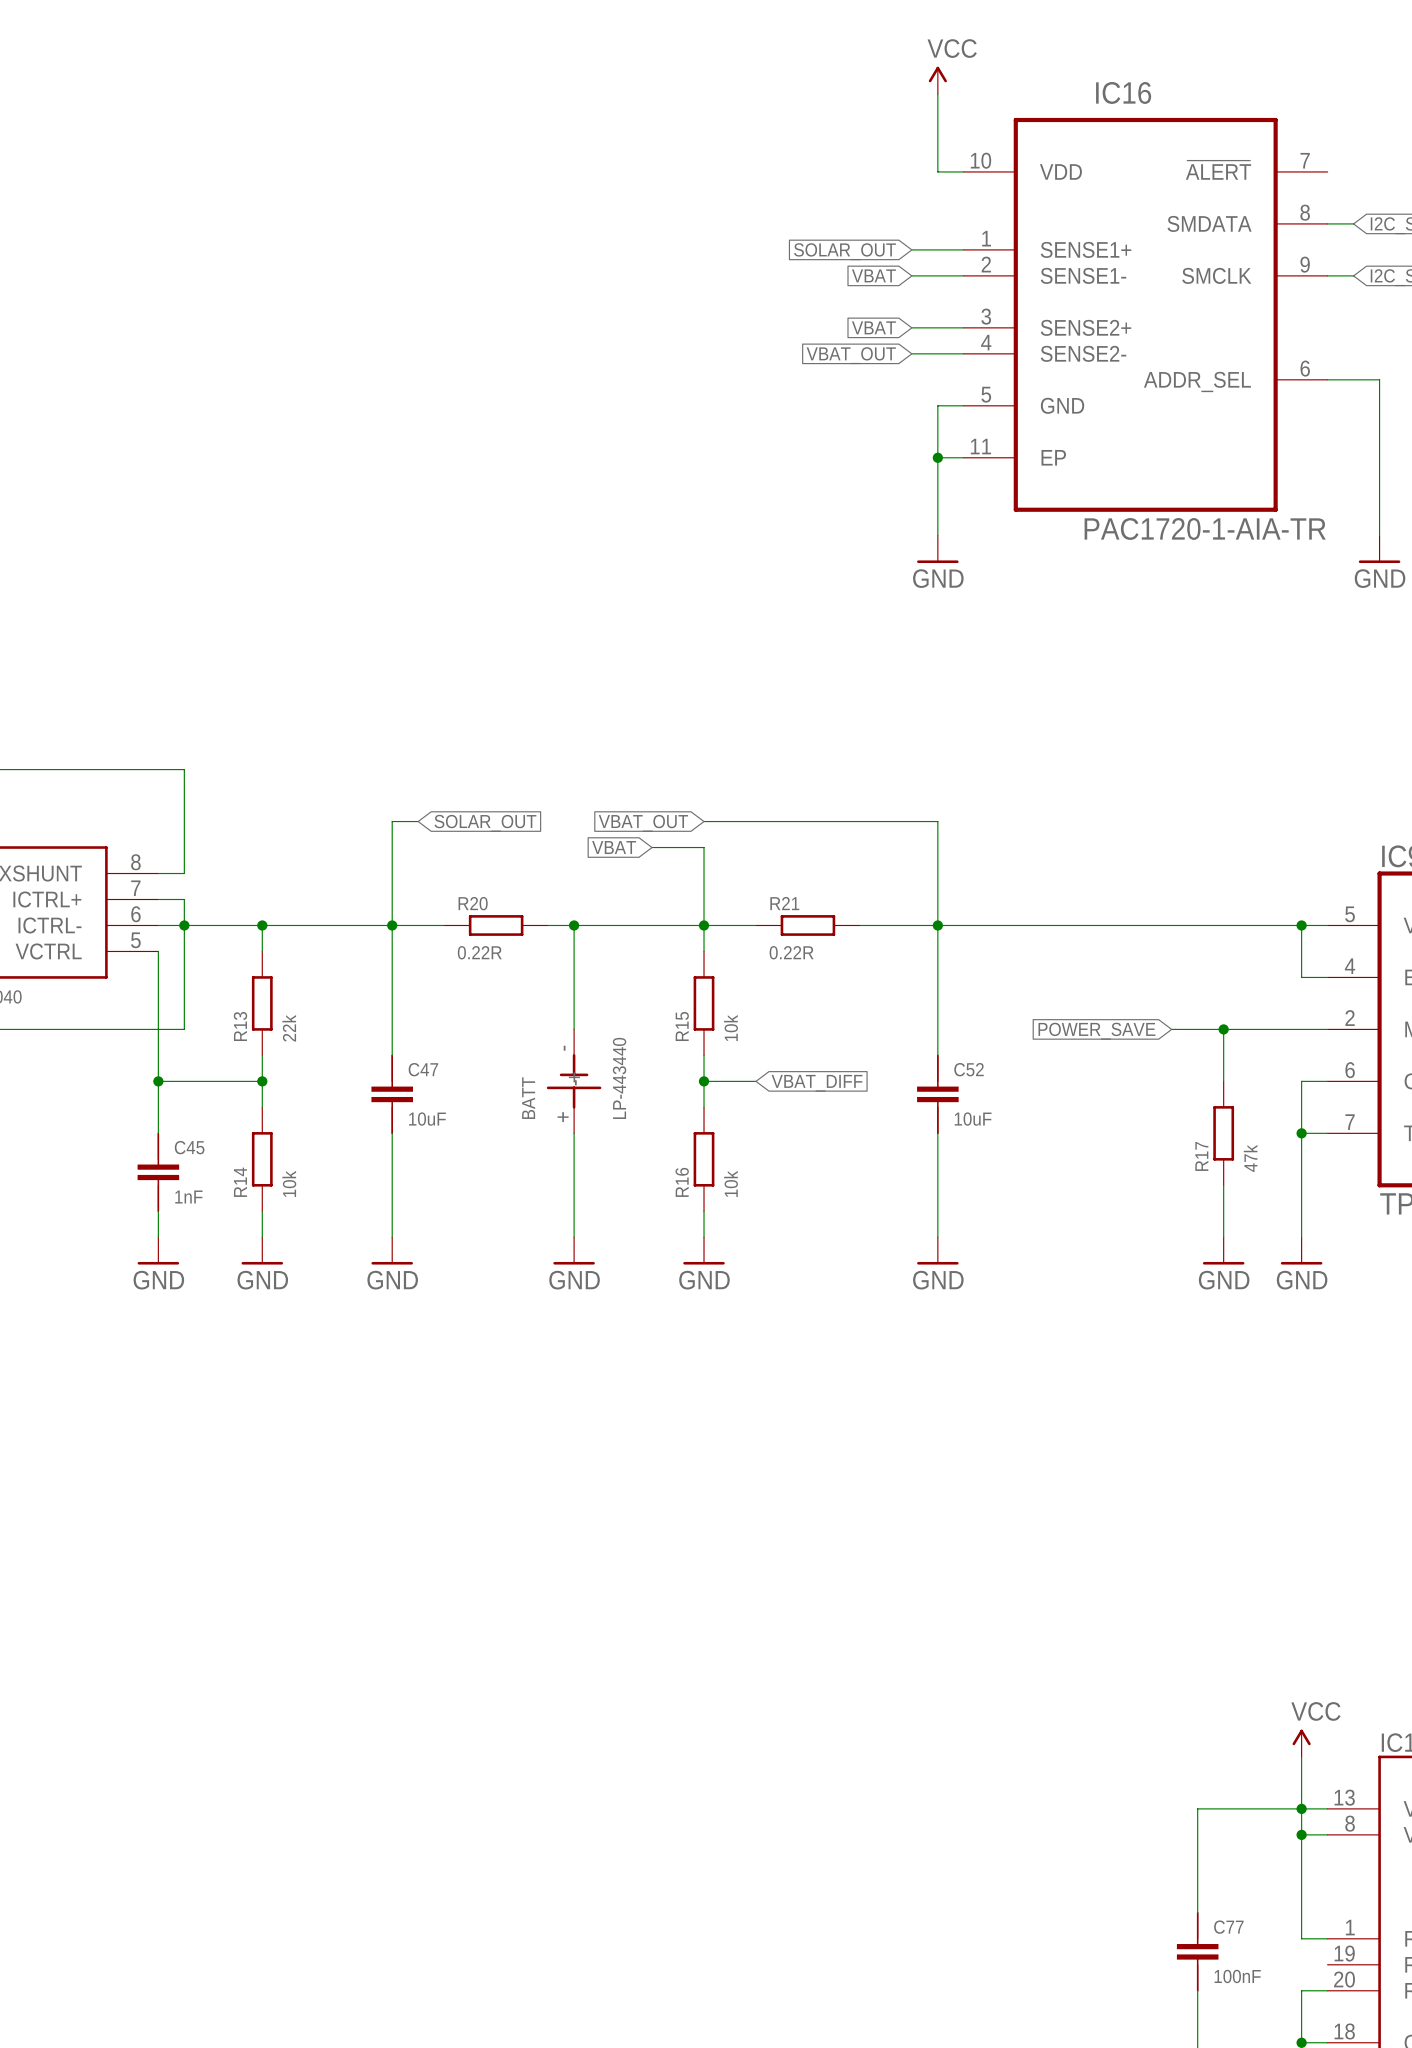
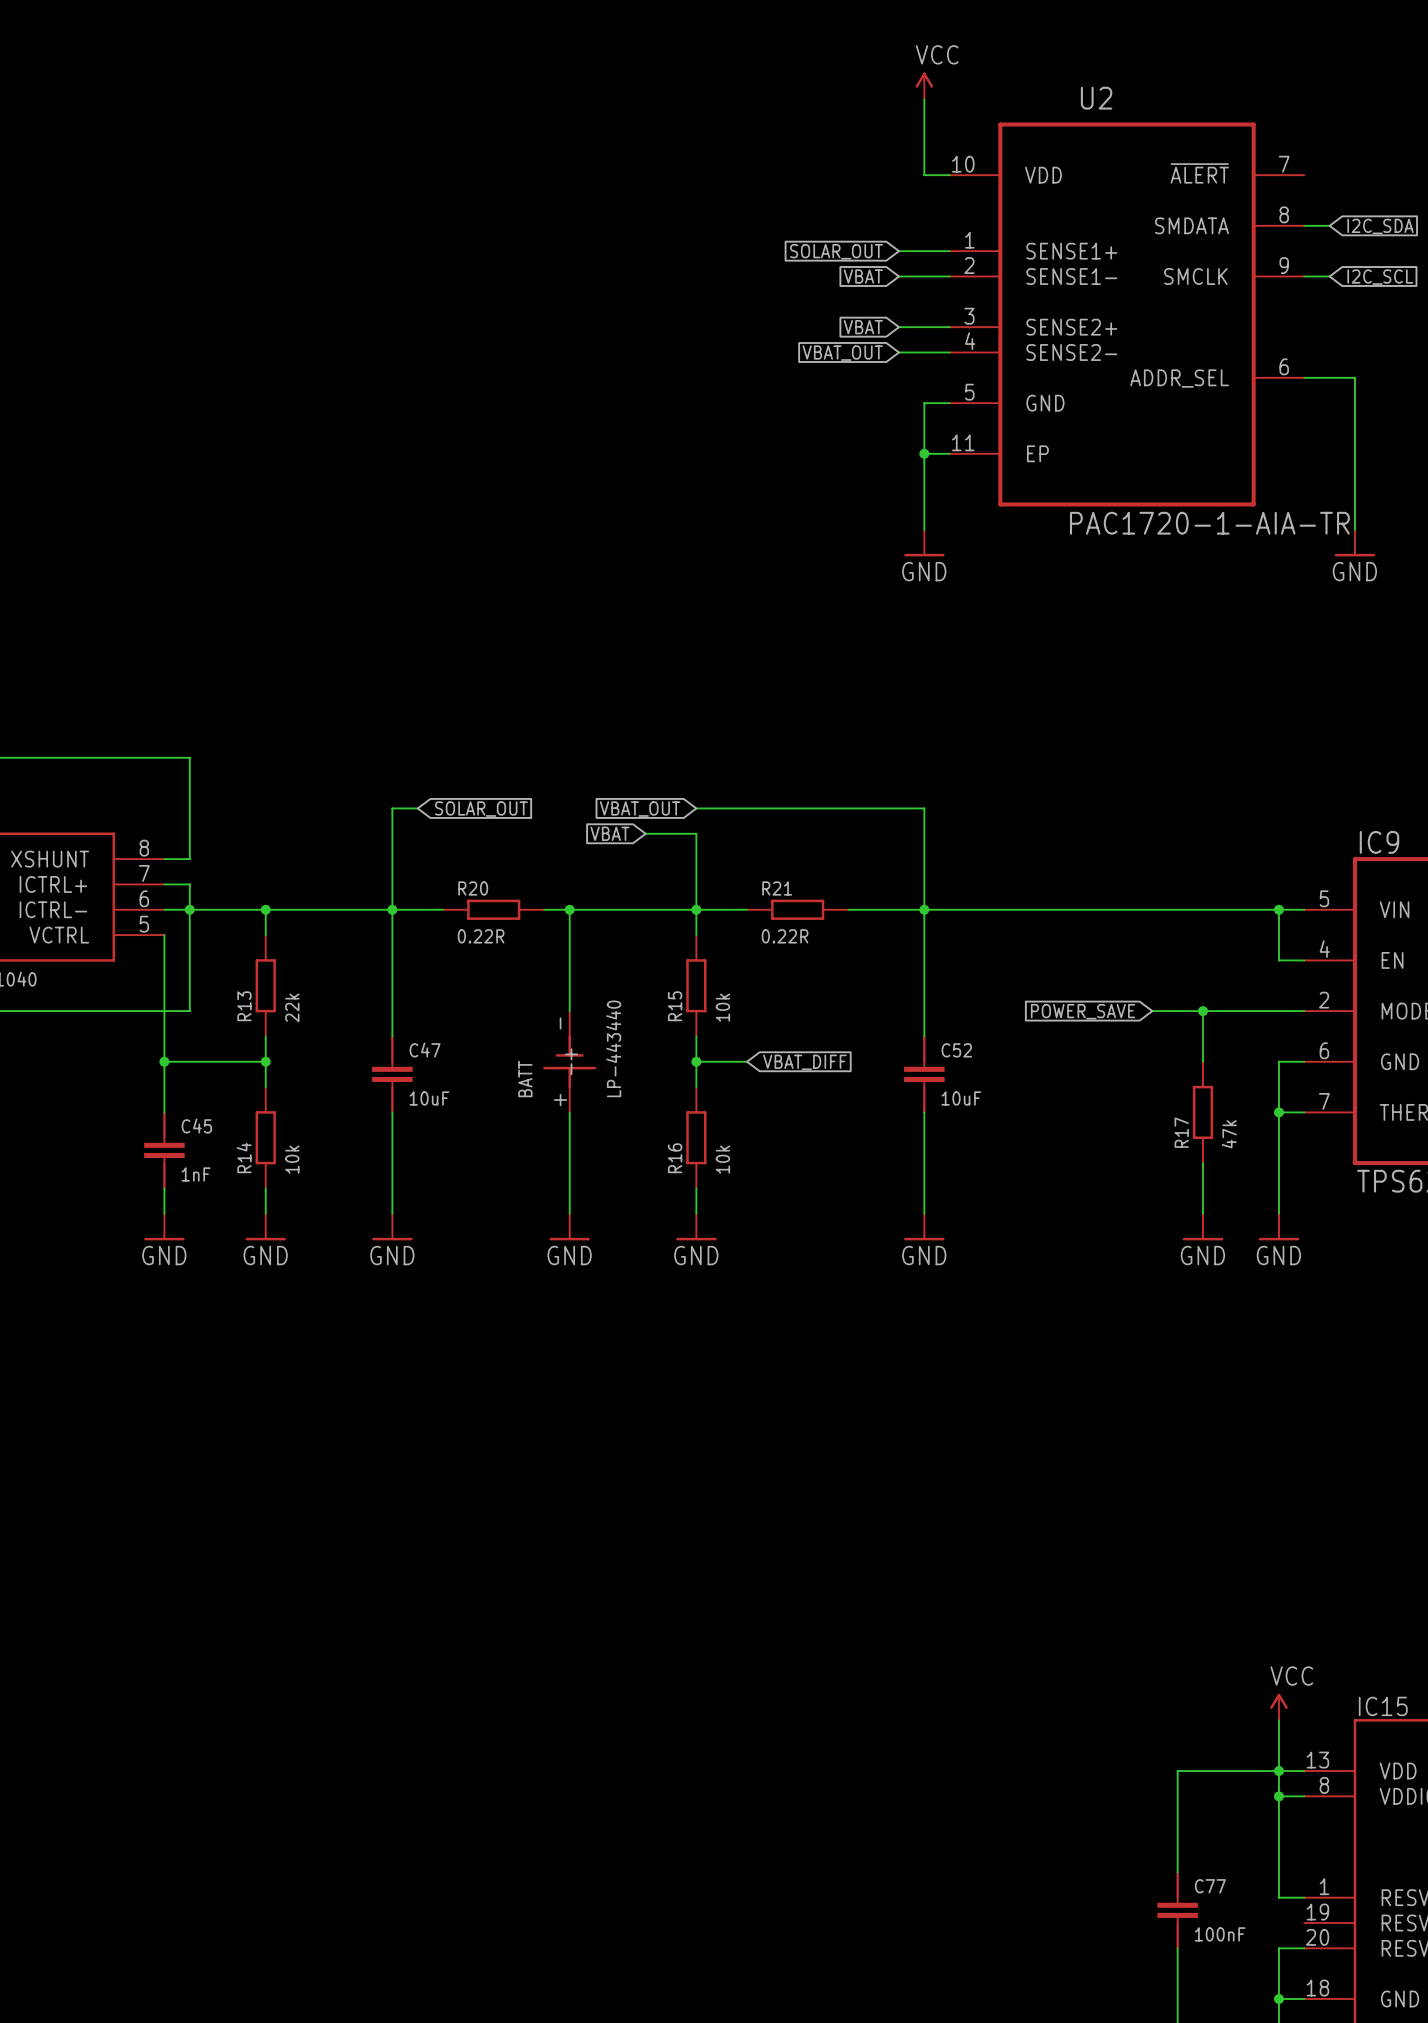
IC16 name: IC16 (1123, 92) -> U2 (1096, 98)

